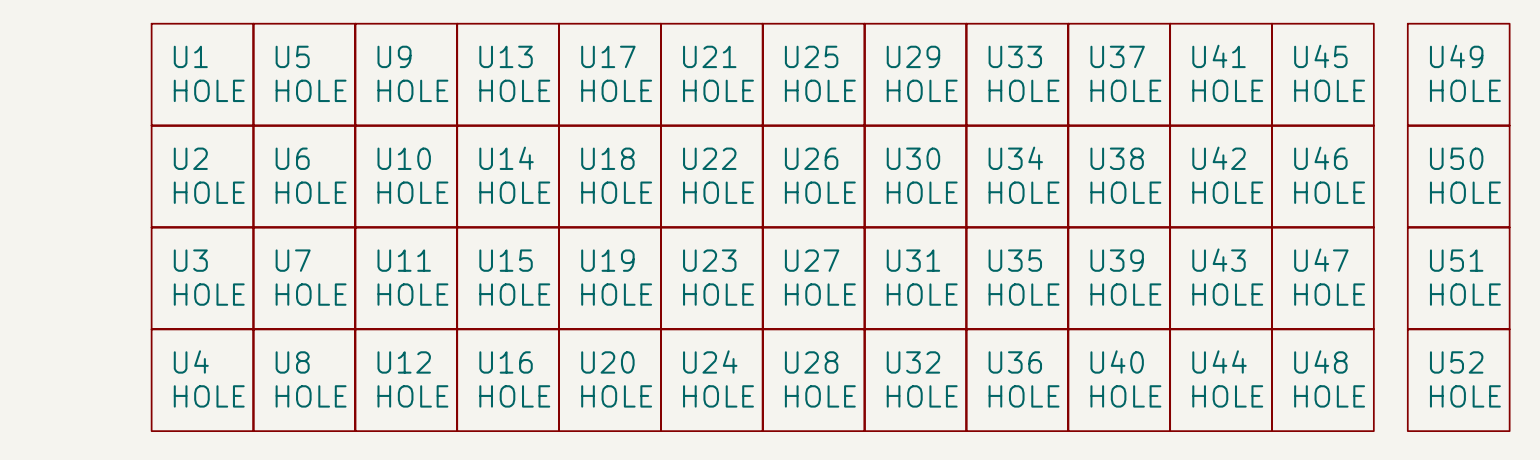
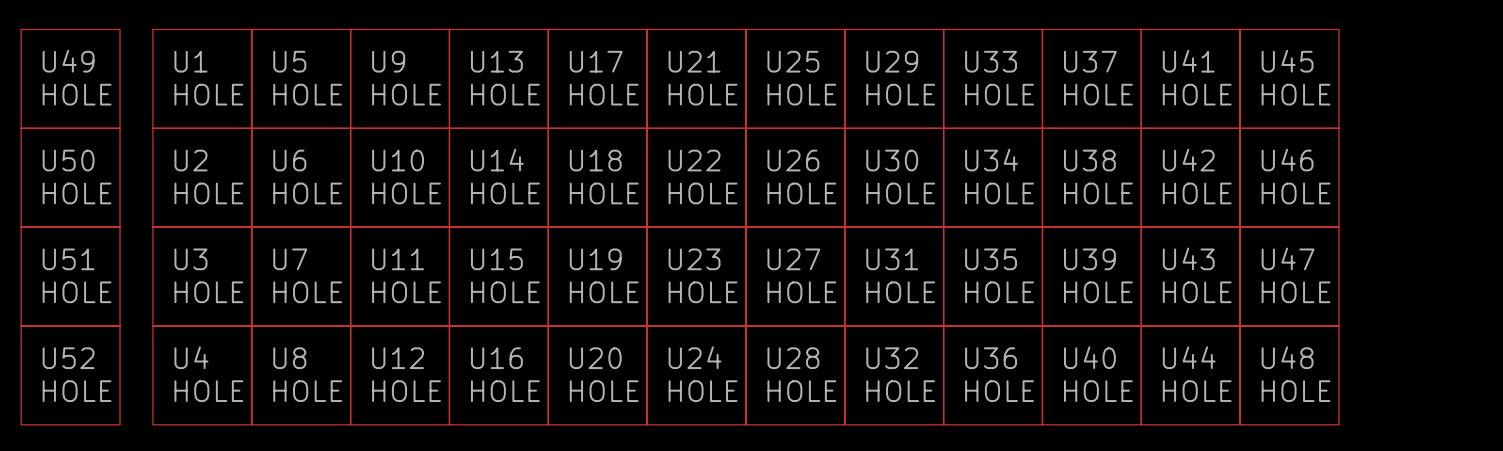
U49 position: (1458, 74) -> (70, 78)
U50 position: (1458, 176) -> (70, 177)
U51 position: (1458, 278) -> (70, 276)
U52 position: (1458, 380) -> (70, 375)

